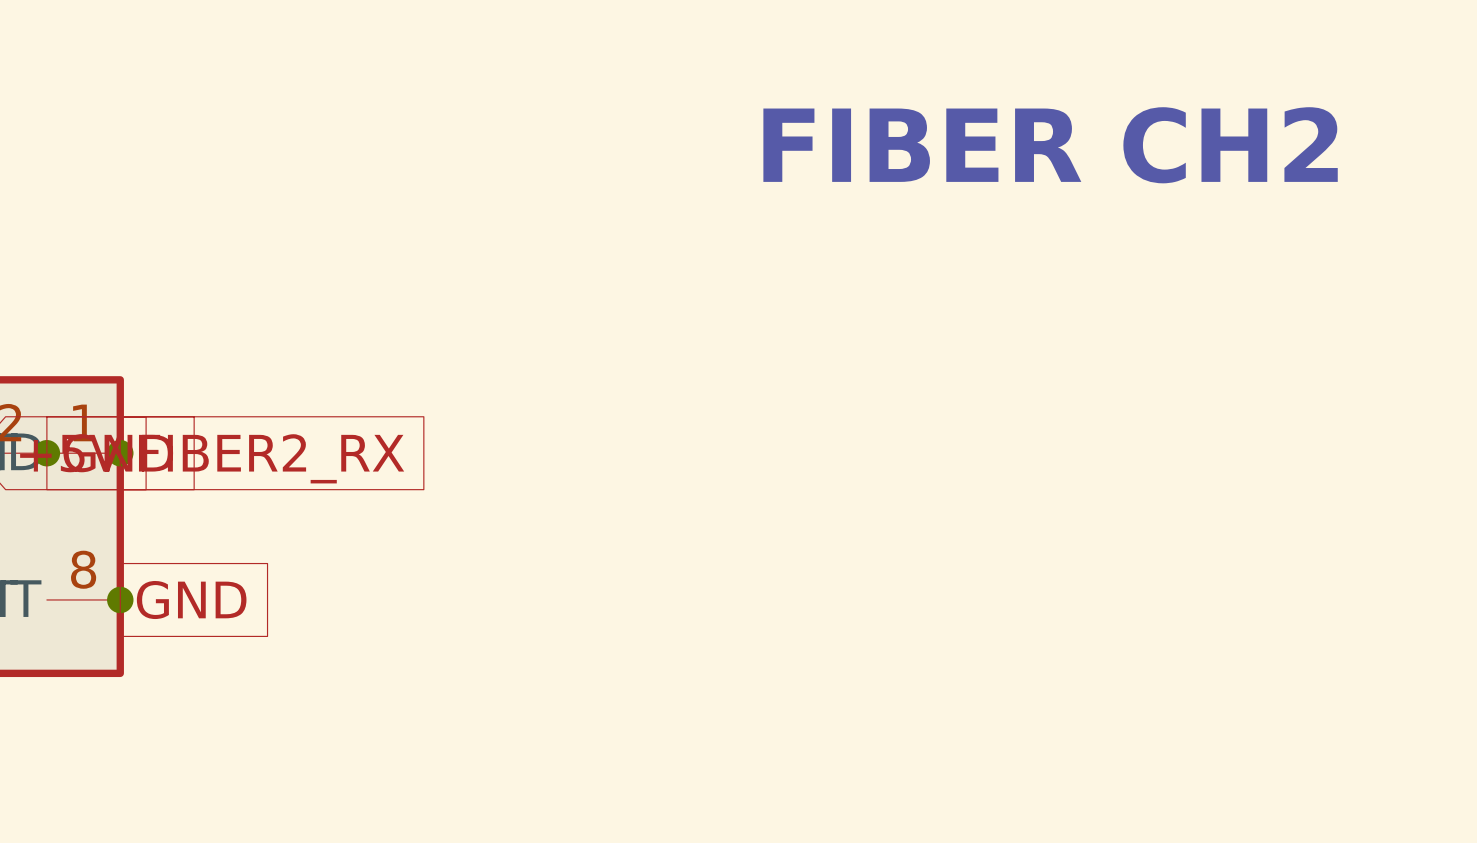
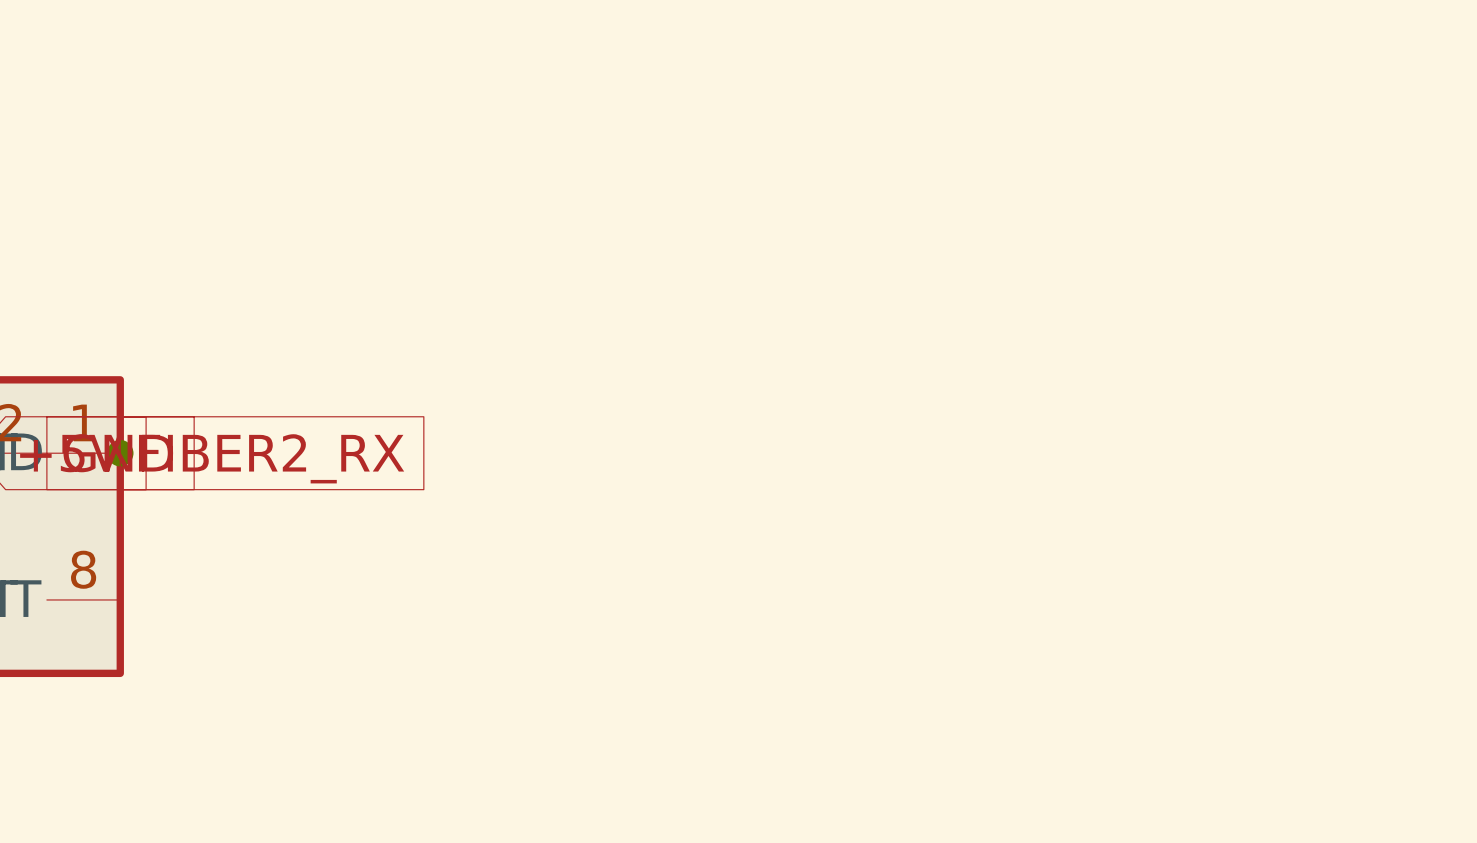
text: FIBER CH2 (1050, 145) -> none
junction: (46, 453) -> none
junction: (120, 599) -> none
global label: GND (191, 600) -> none

